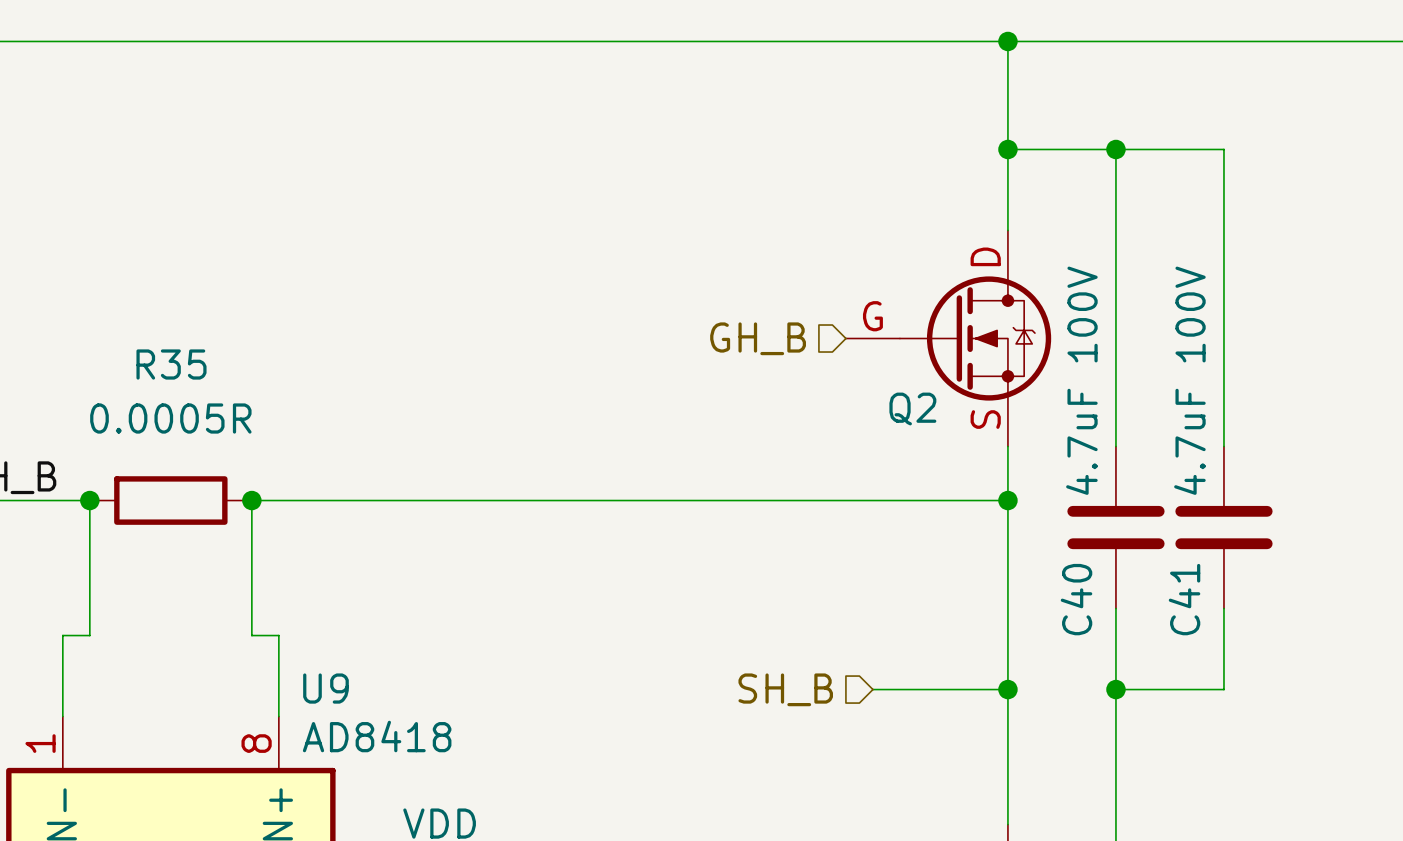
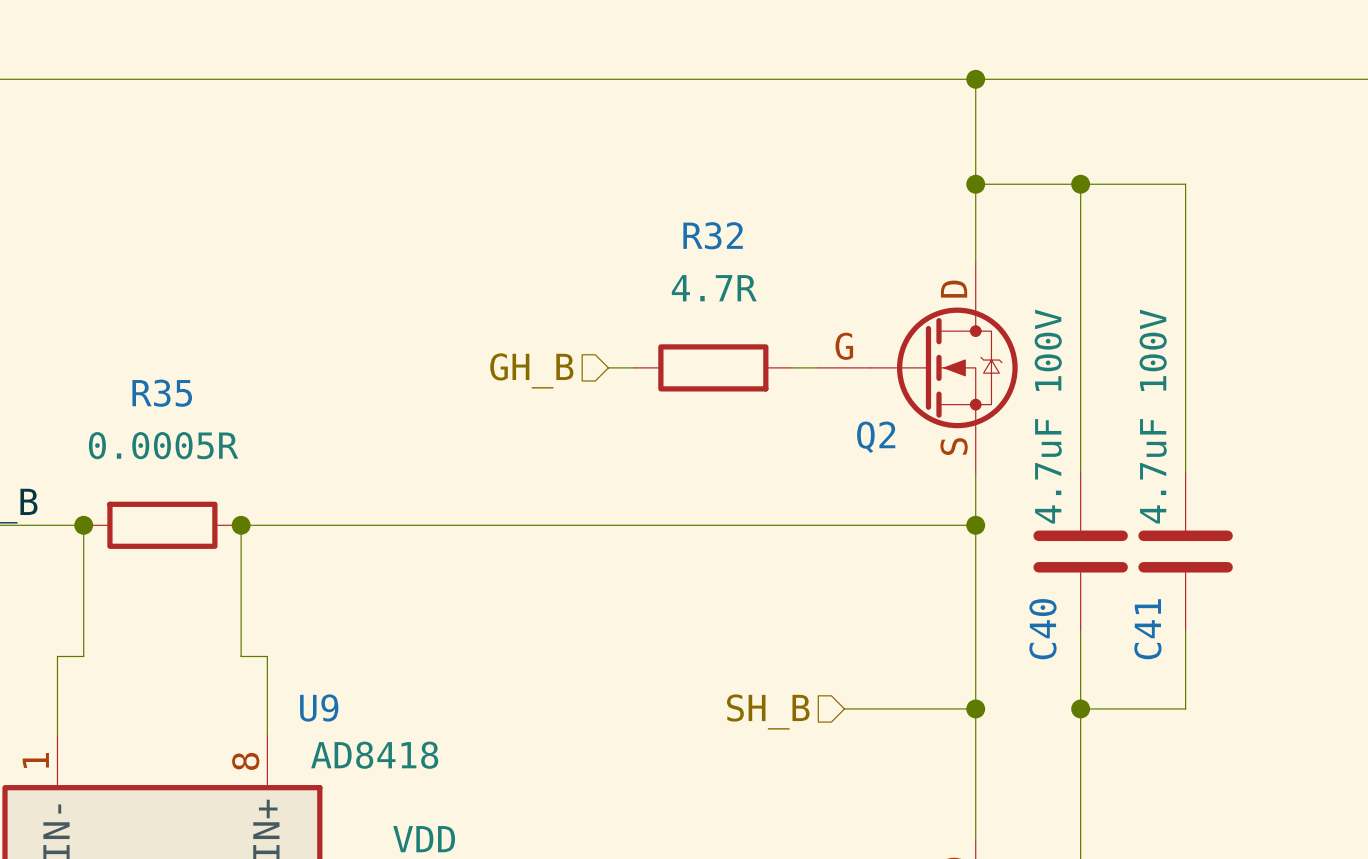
wire: none -> (608, 367) (634, 367)
R32: none -> 4.7R (713, 367)
hierarchical label position: GH_B (758, 338) -> GH_B (531, 370)
wire: none -> (792, 367) (818, 367)

